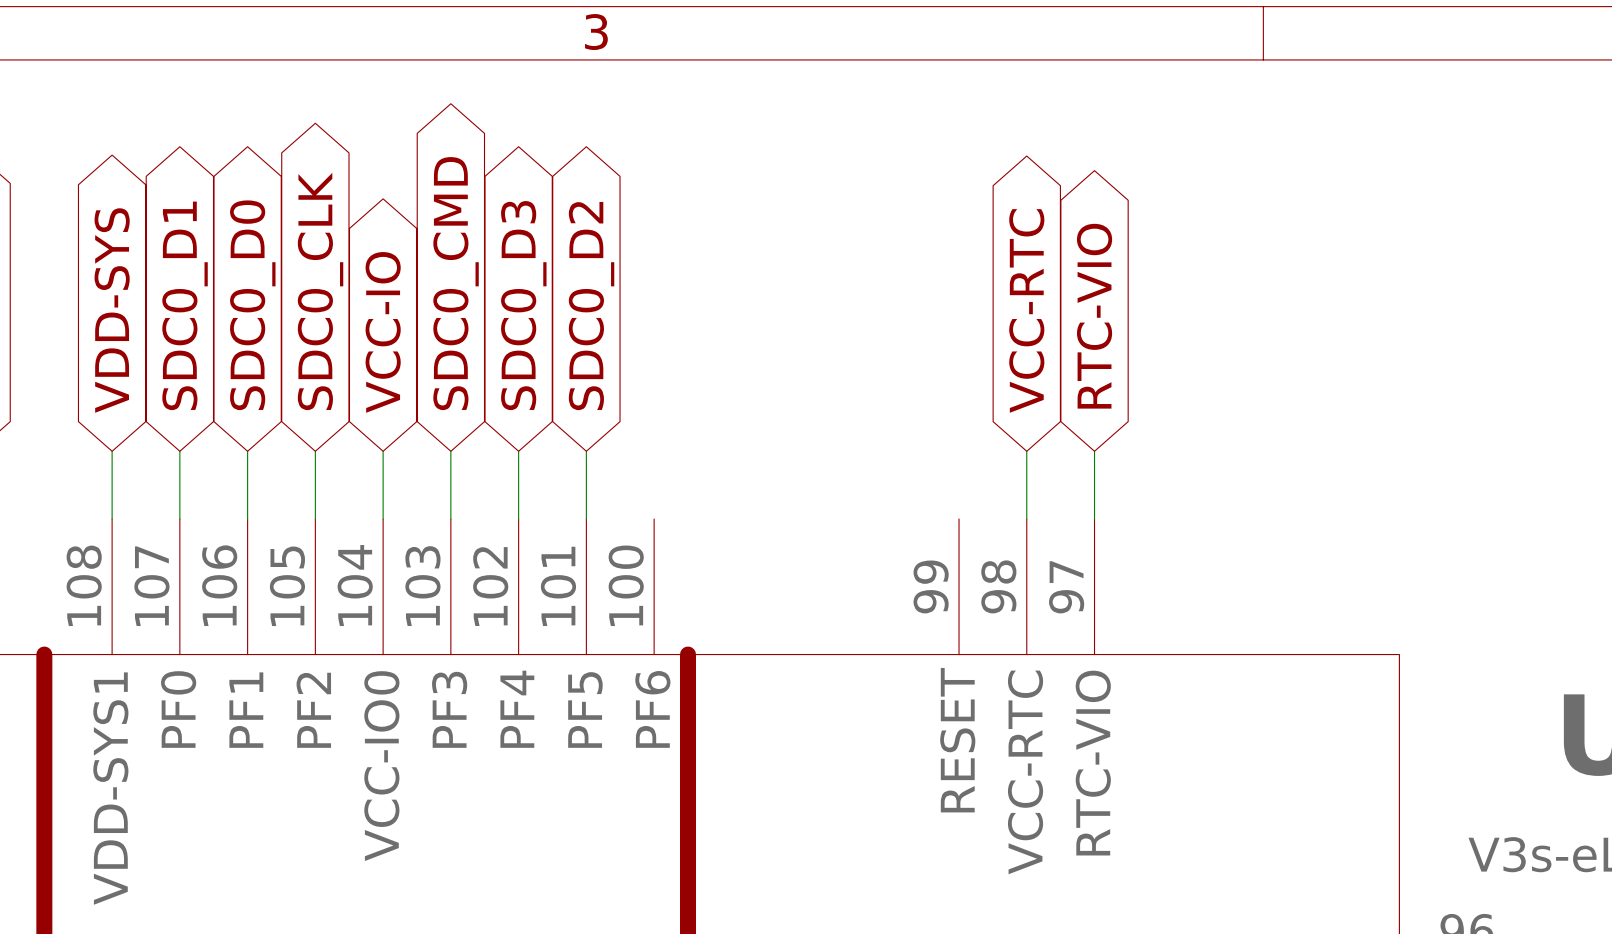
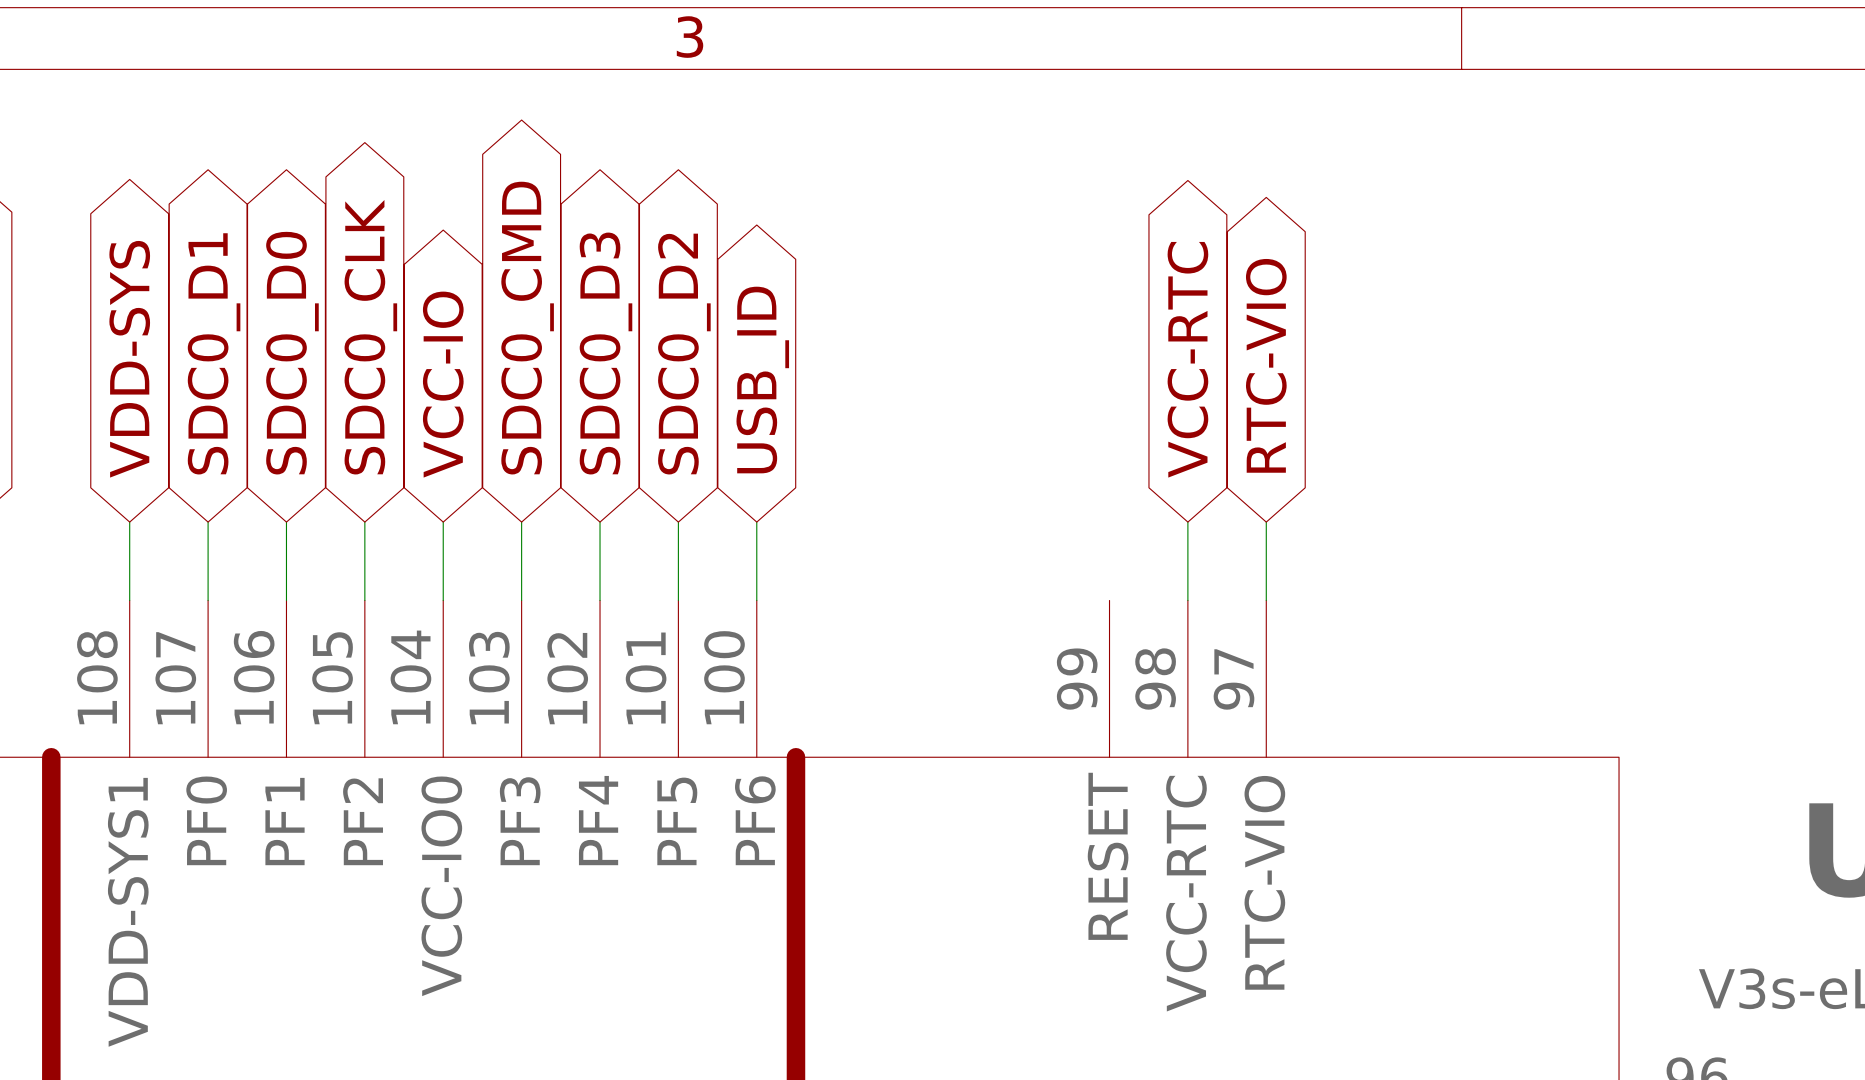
global label: none -> USB_ID (762, 380)
wire: none -> (756, 522) (756, 600)

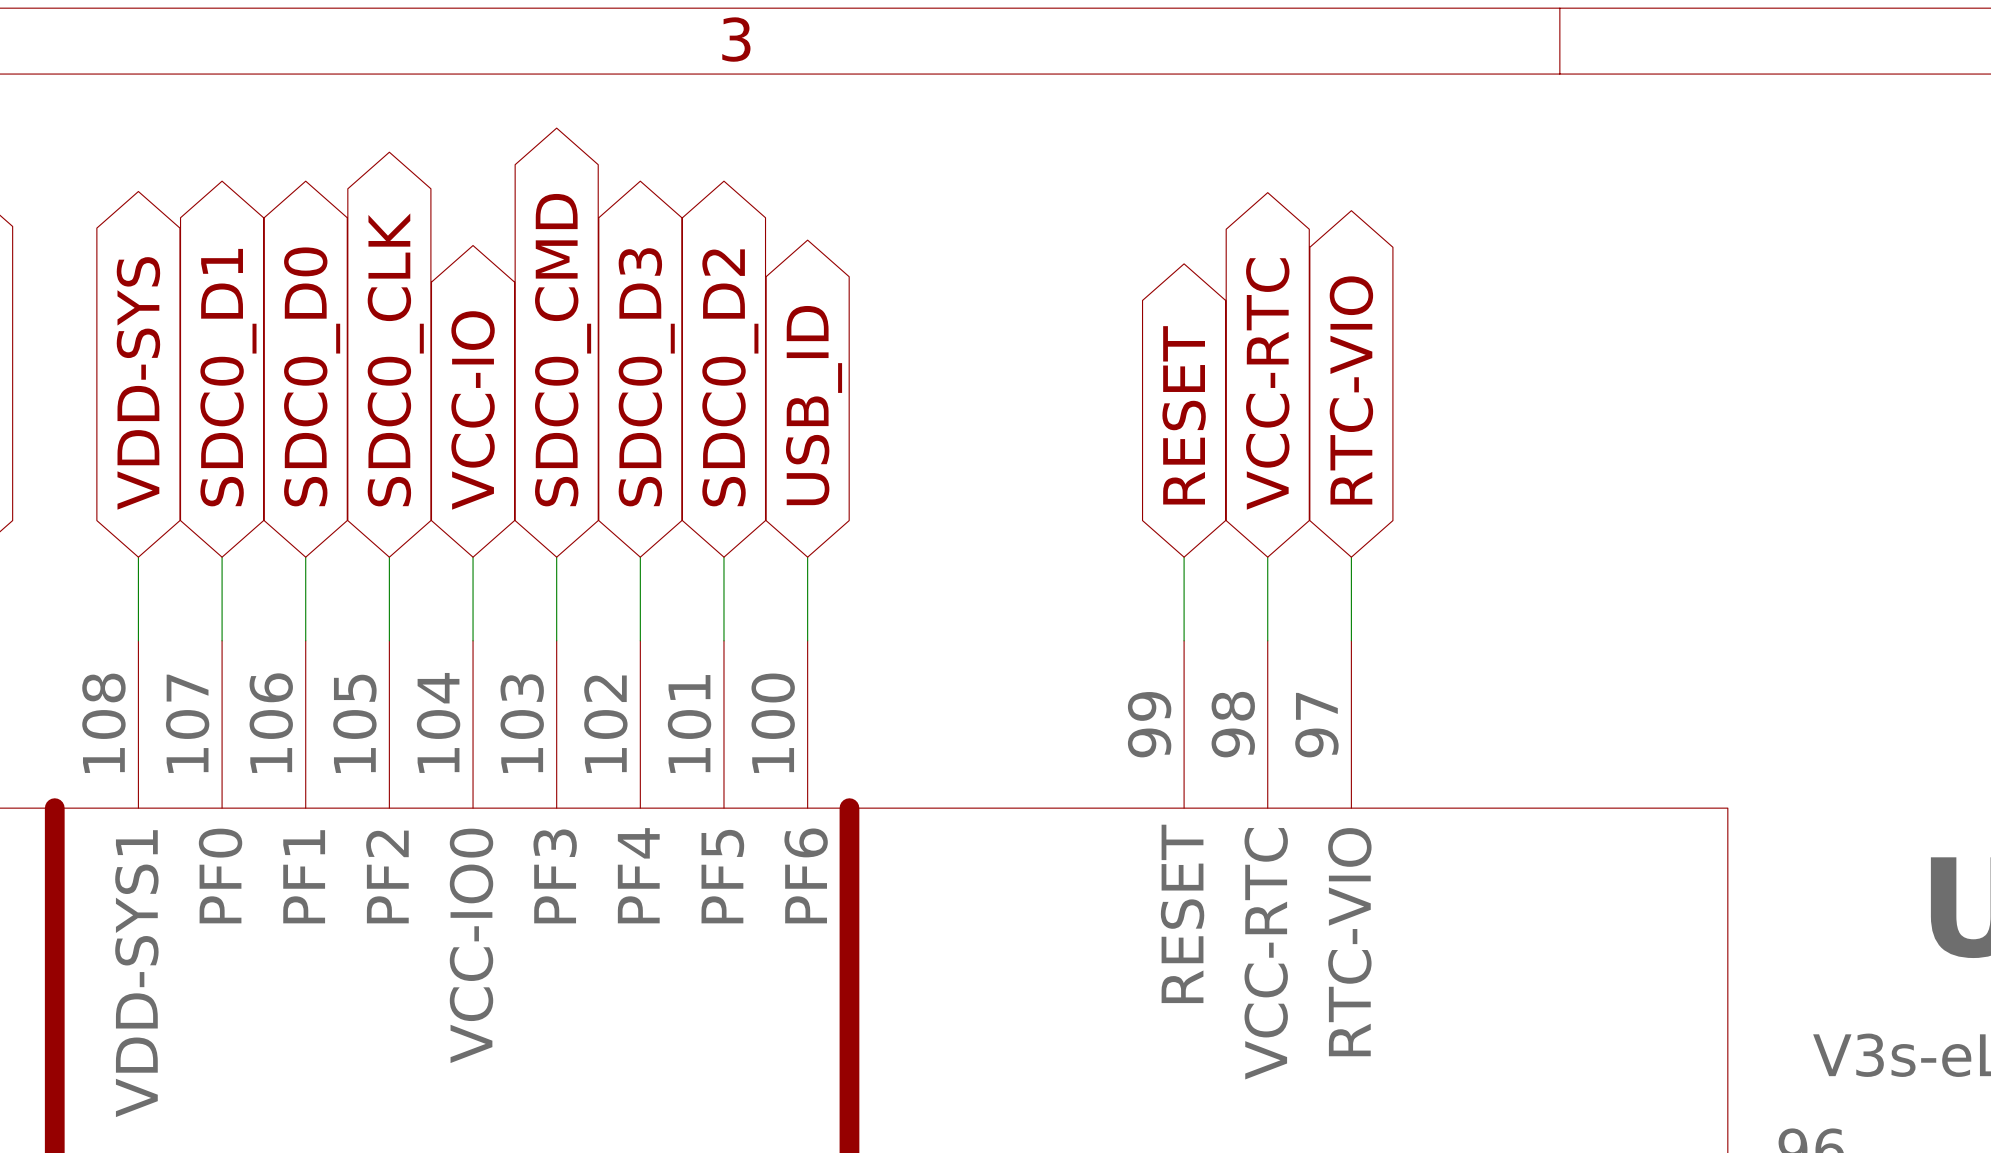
global label: none -> RESET (1184, 415)
wire: none -> (1184, 557) (1184, 640)

